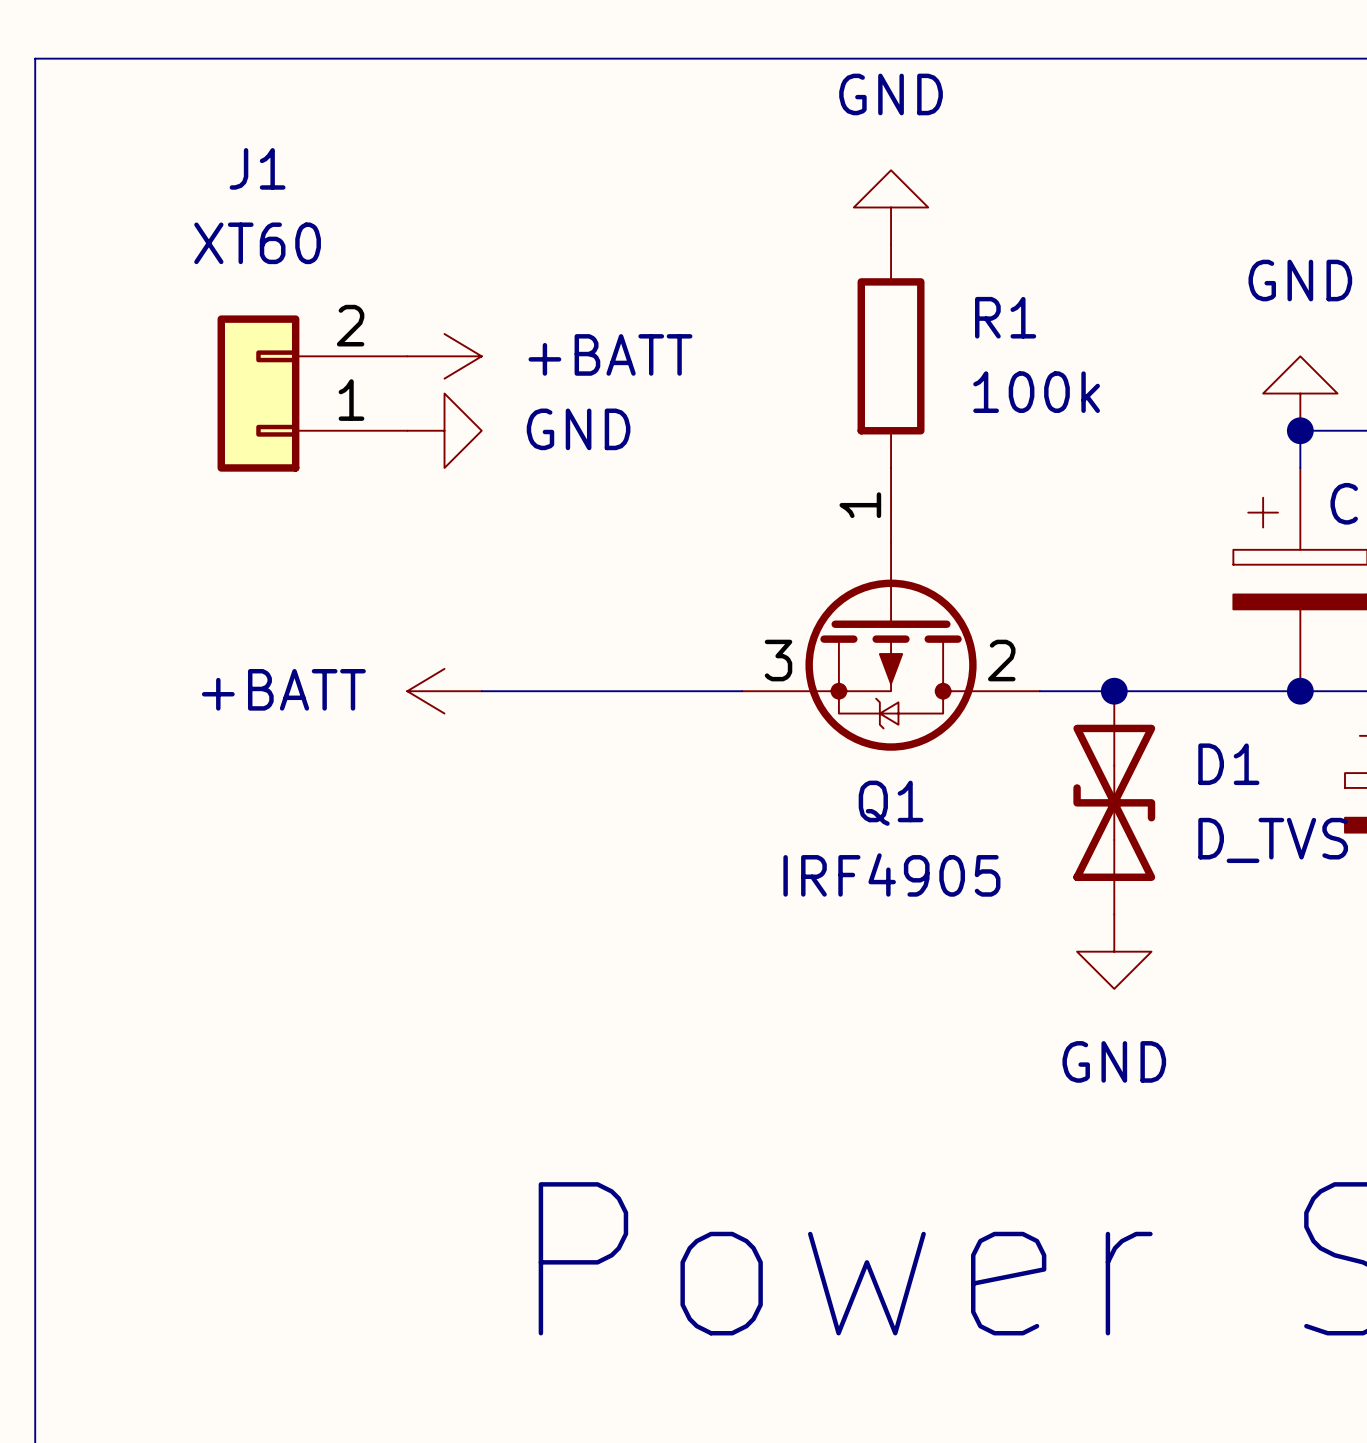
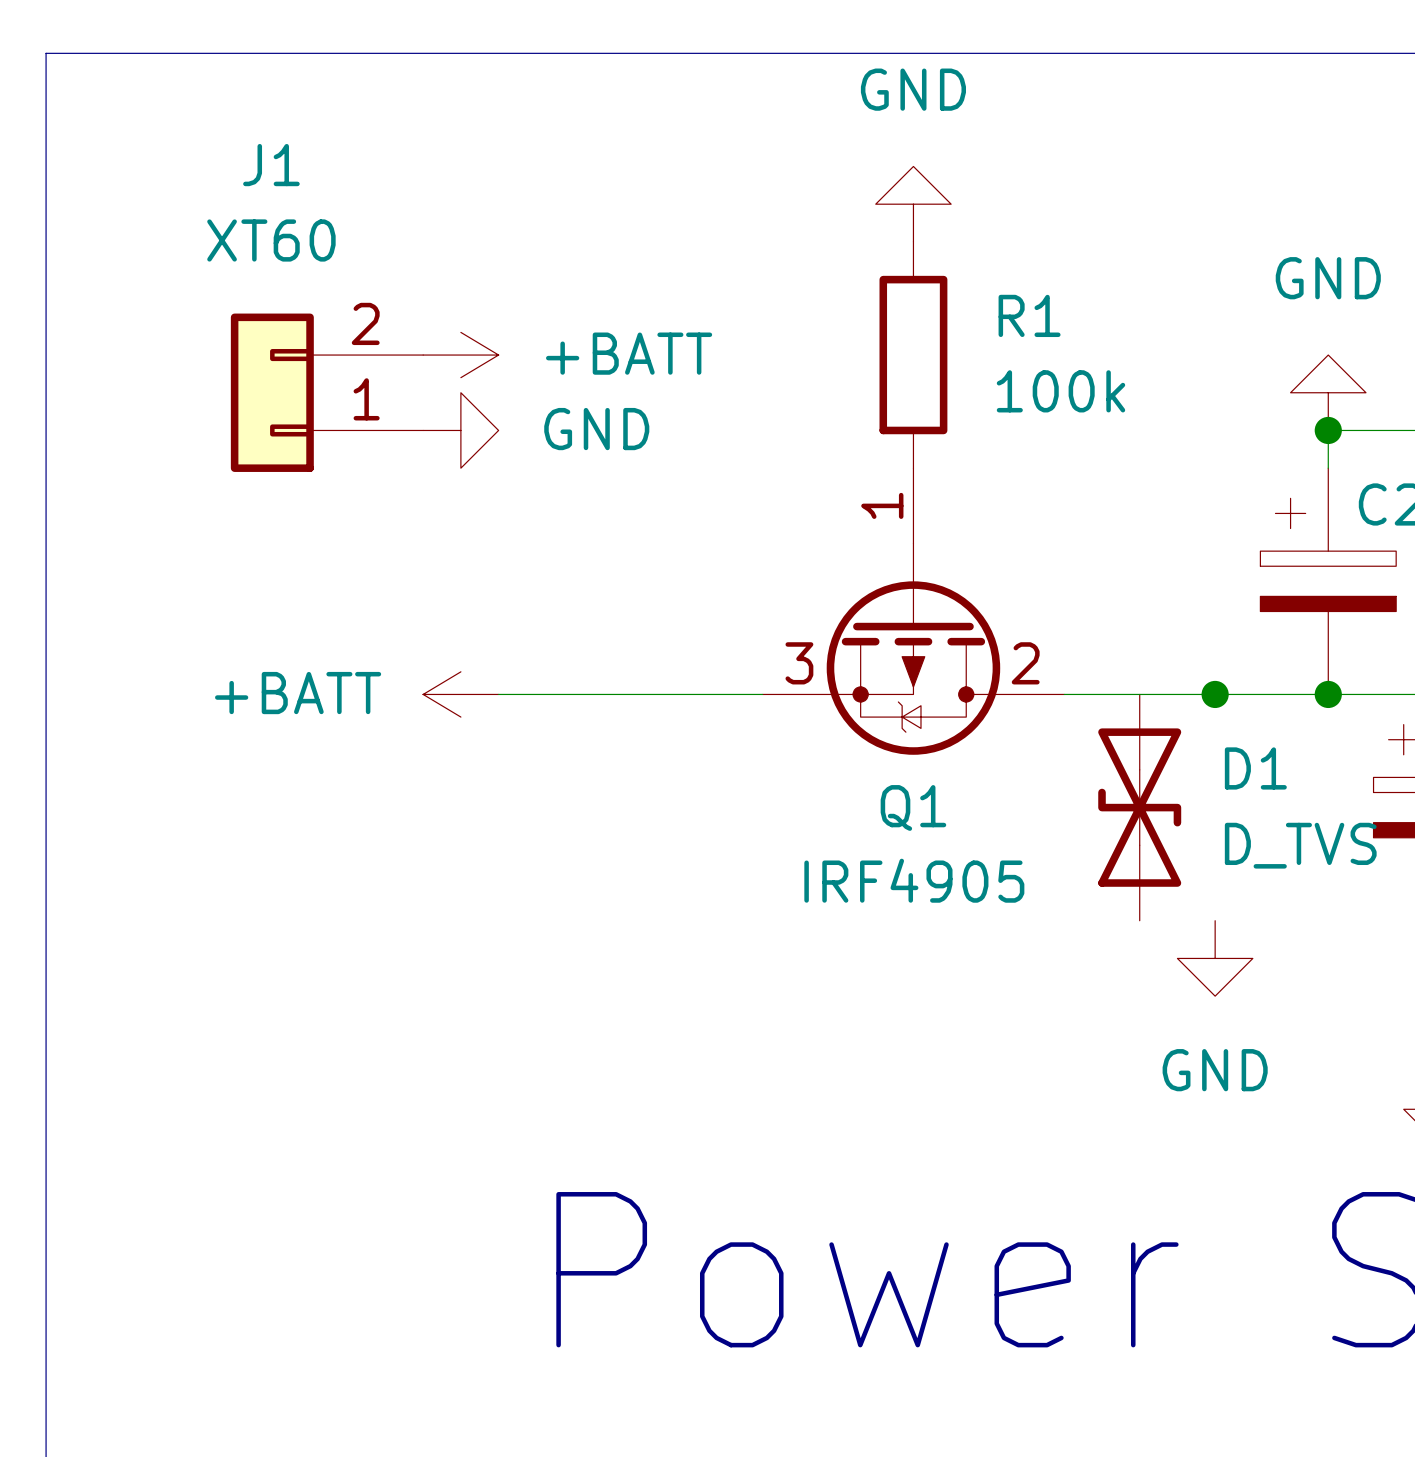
junction position: (1114, 691) -> (1215, 694)
power symbol position: GND (1114, 951) -> GND (1215, 958)

